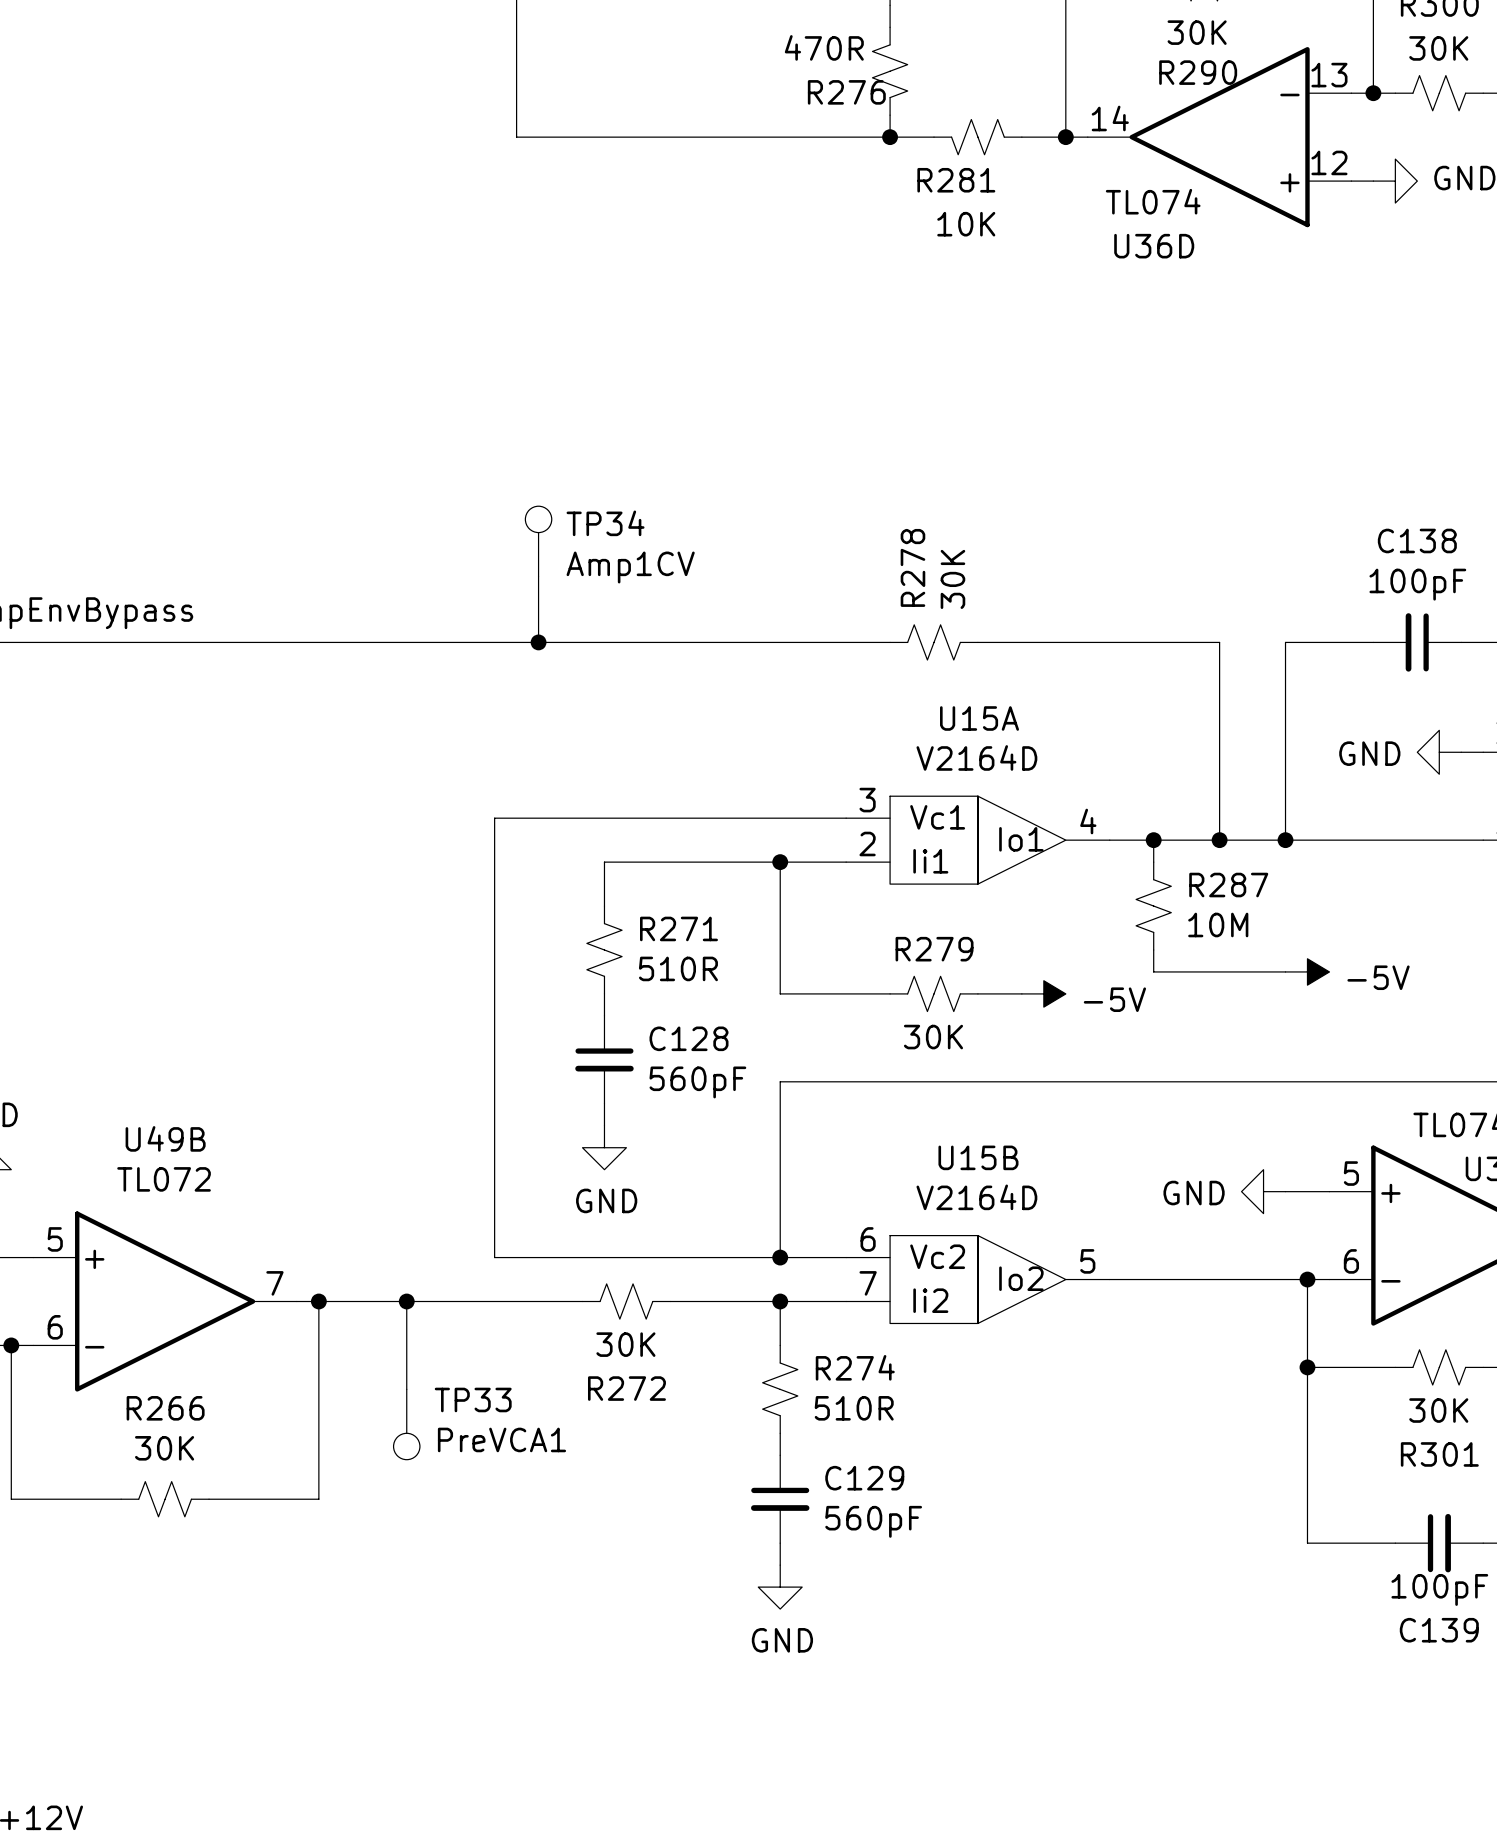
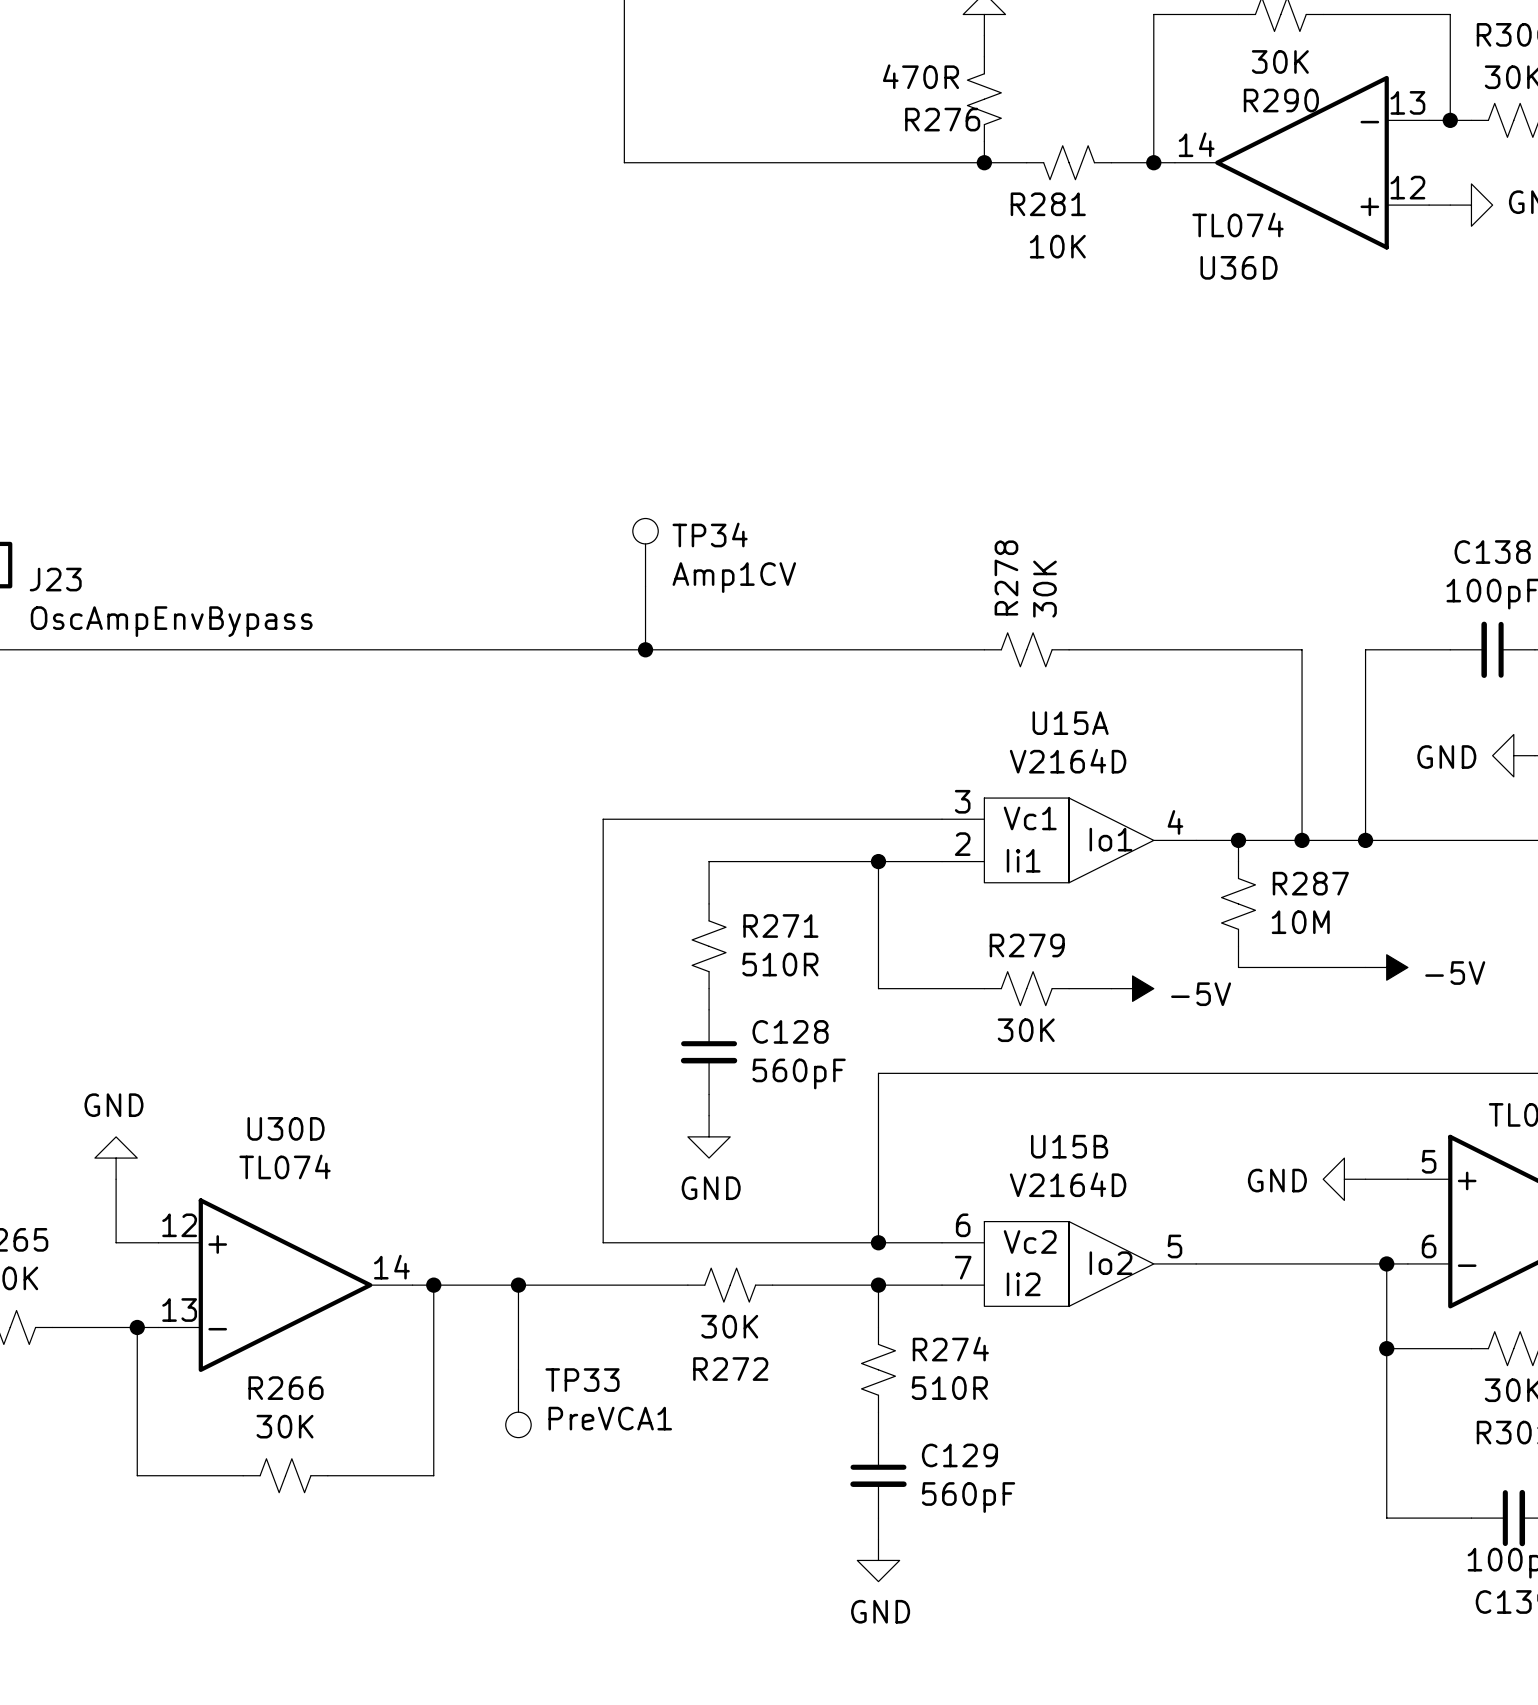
U49B name: U49B (165, 1138) -> U30D (286, 1128)
U49B value: TL072 (164, 1179) -> TL074 (285, 1166)
U49B pin number: 5 (55, 1239) -> 12 (179, 1225)
U49B pin number: 7 (274, 1283) -> 14 (391, 1267)
U49B pin number: 6 (55, 1327) -> 13 (179, 1310)

